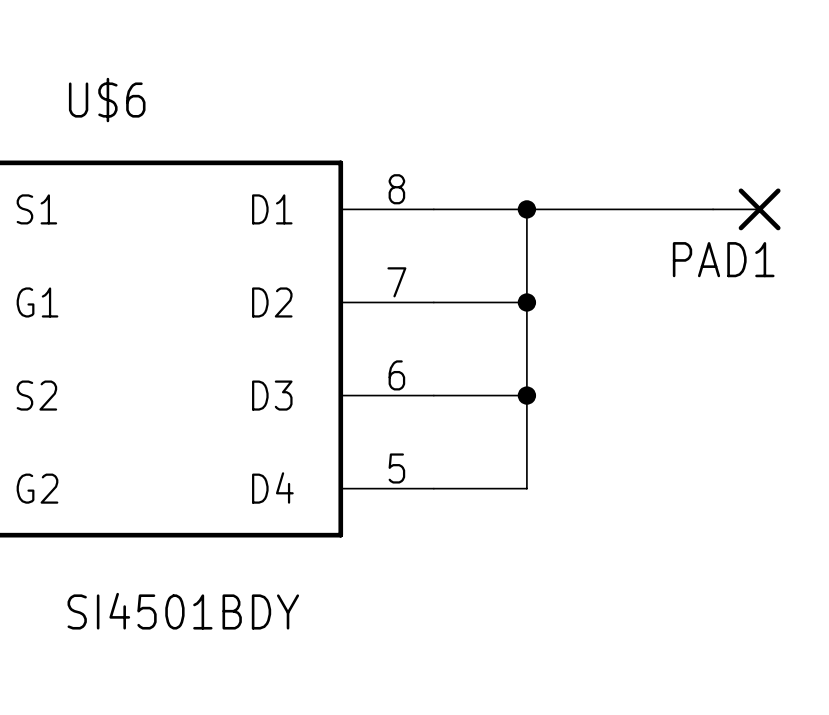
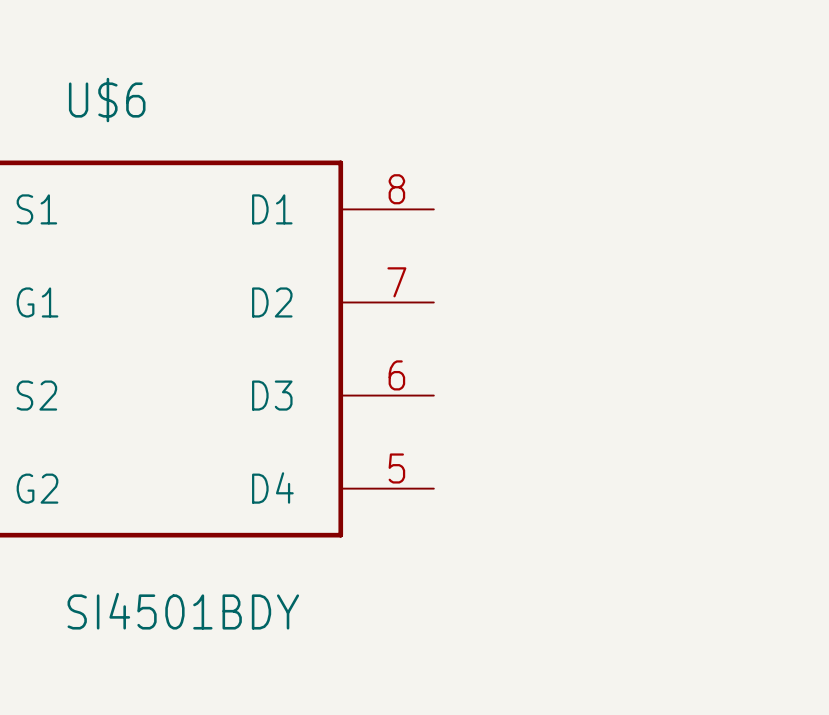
wire: (433, 209) (713, 209) -> none
wire: (526, 209) (526, 488) (433, 488) -> none
junction: (526, 209) -> none
PAD1: (746, 209) -> none
wire: (433, 302) (526, 302) -> none
junction: (526, 302) -> none
wire: (433, 395) (526, 395) -> none
junction: (526, 395) -> none

